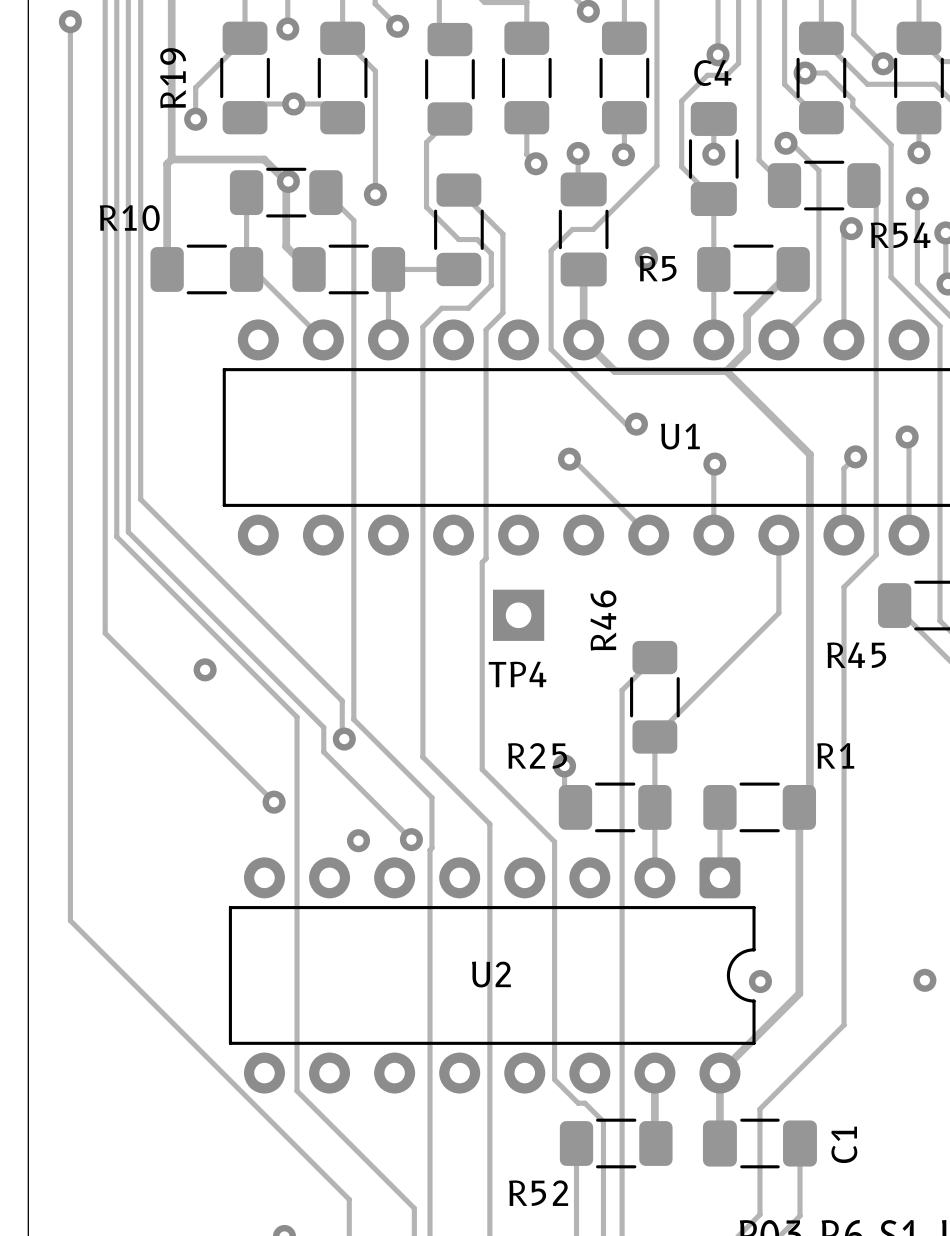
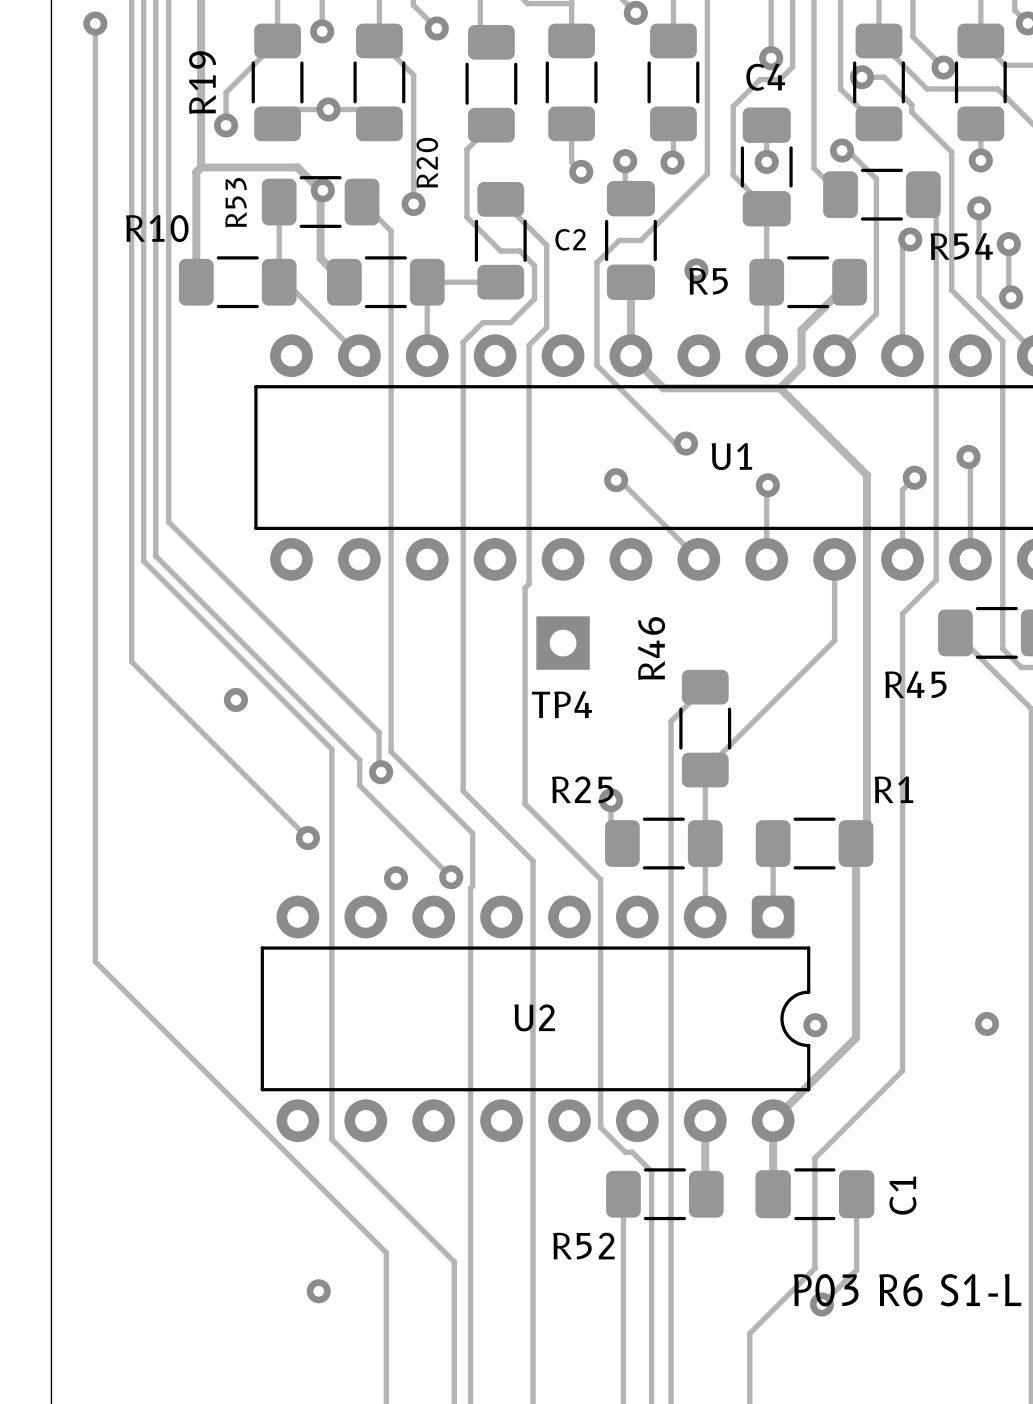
R20 name: none -> R20 (427, 162)
R53 name: none -> R53 (236, 202)
C2 name: none -> C2 (570, 239)

